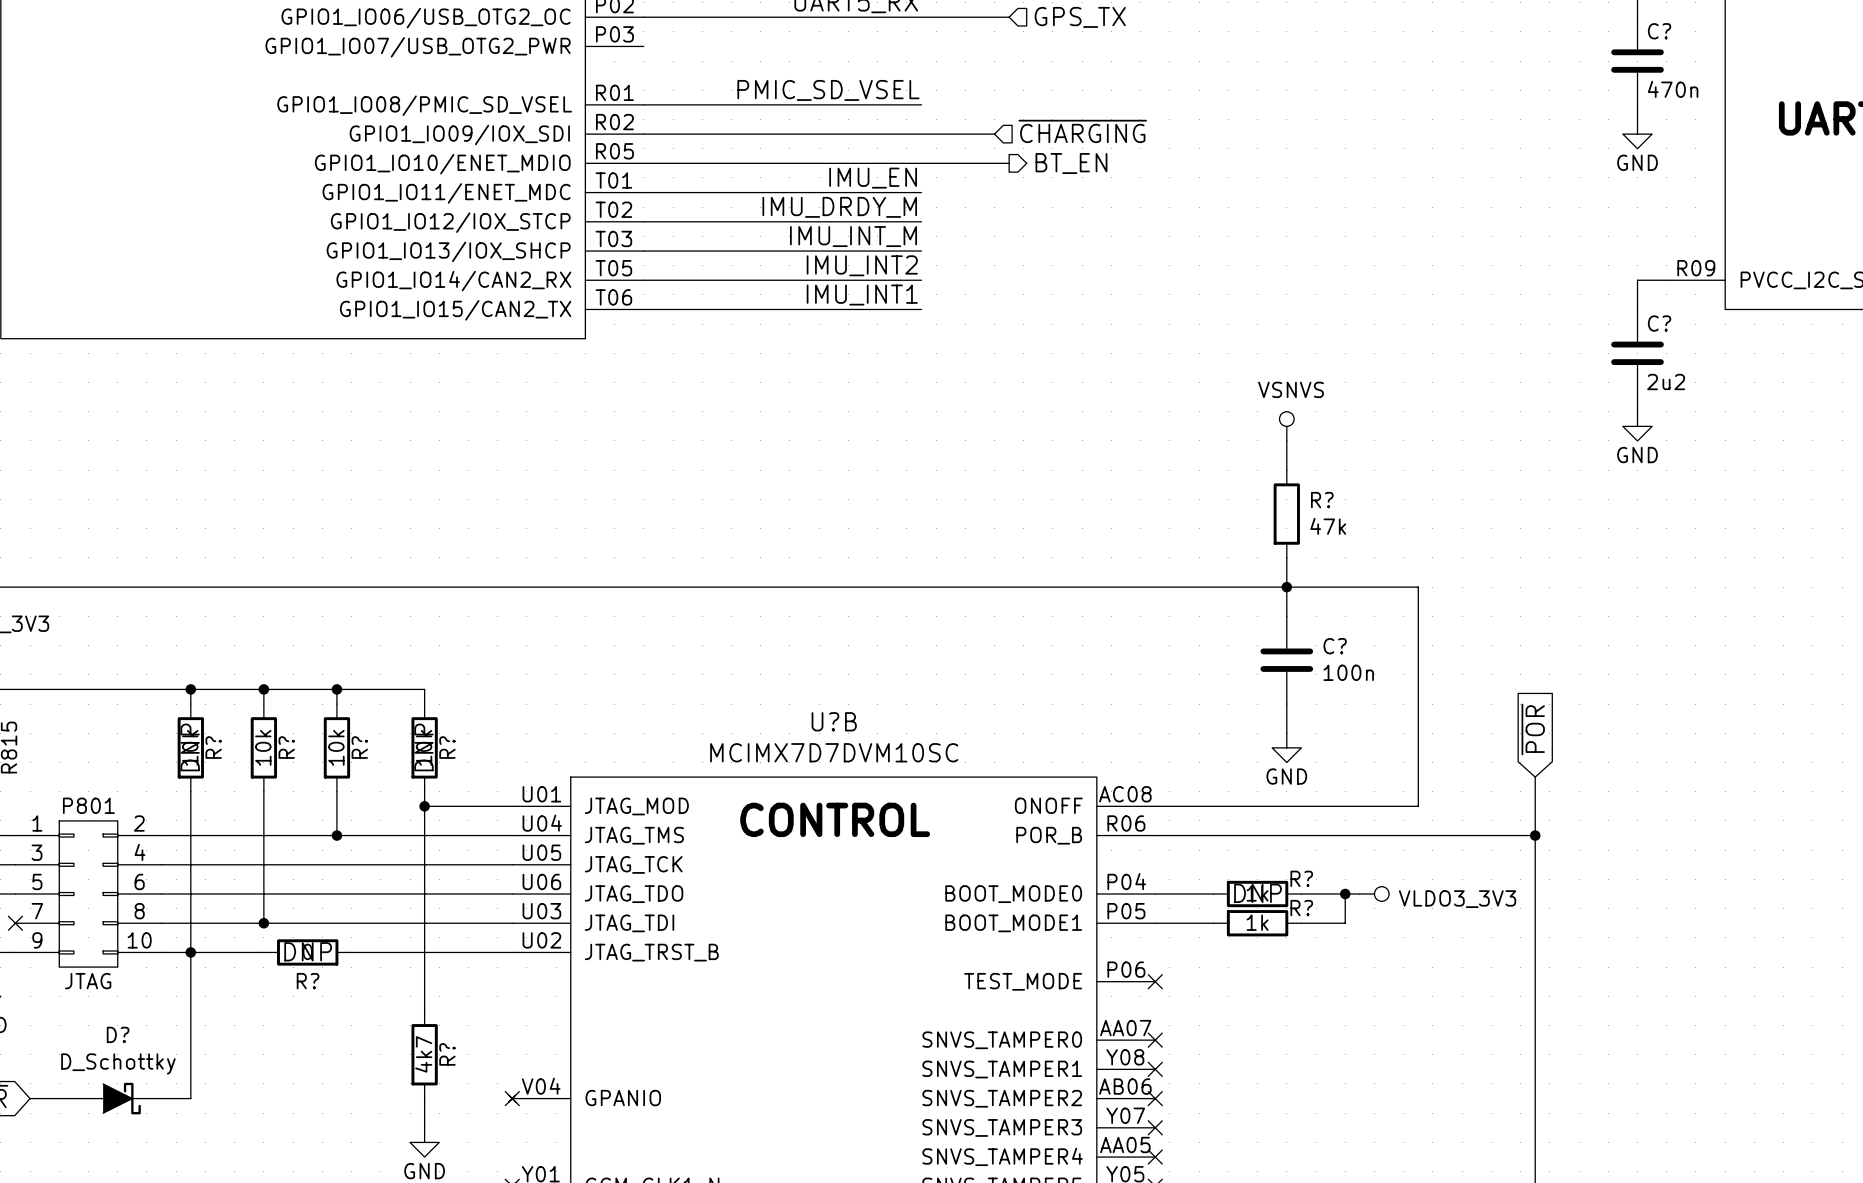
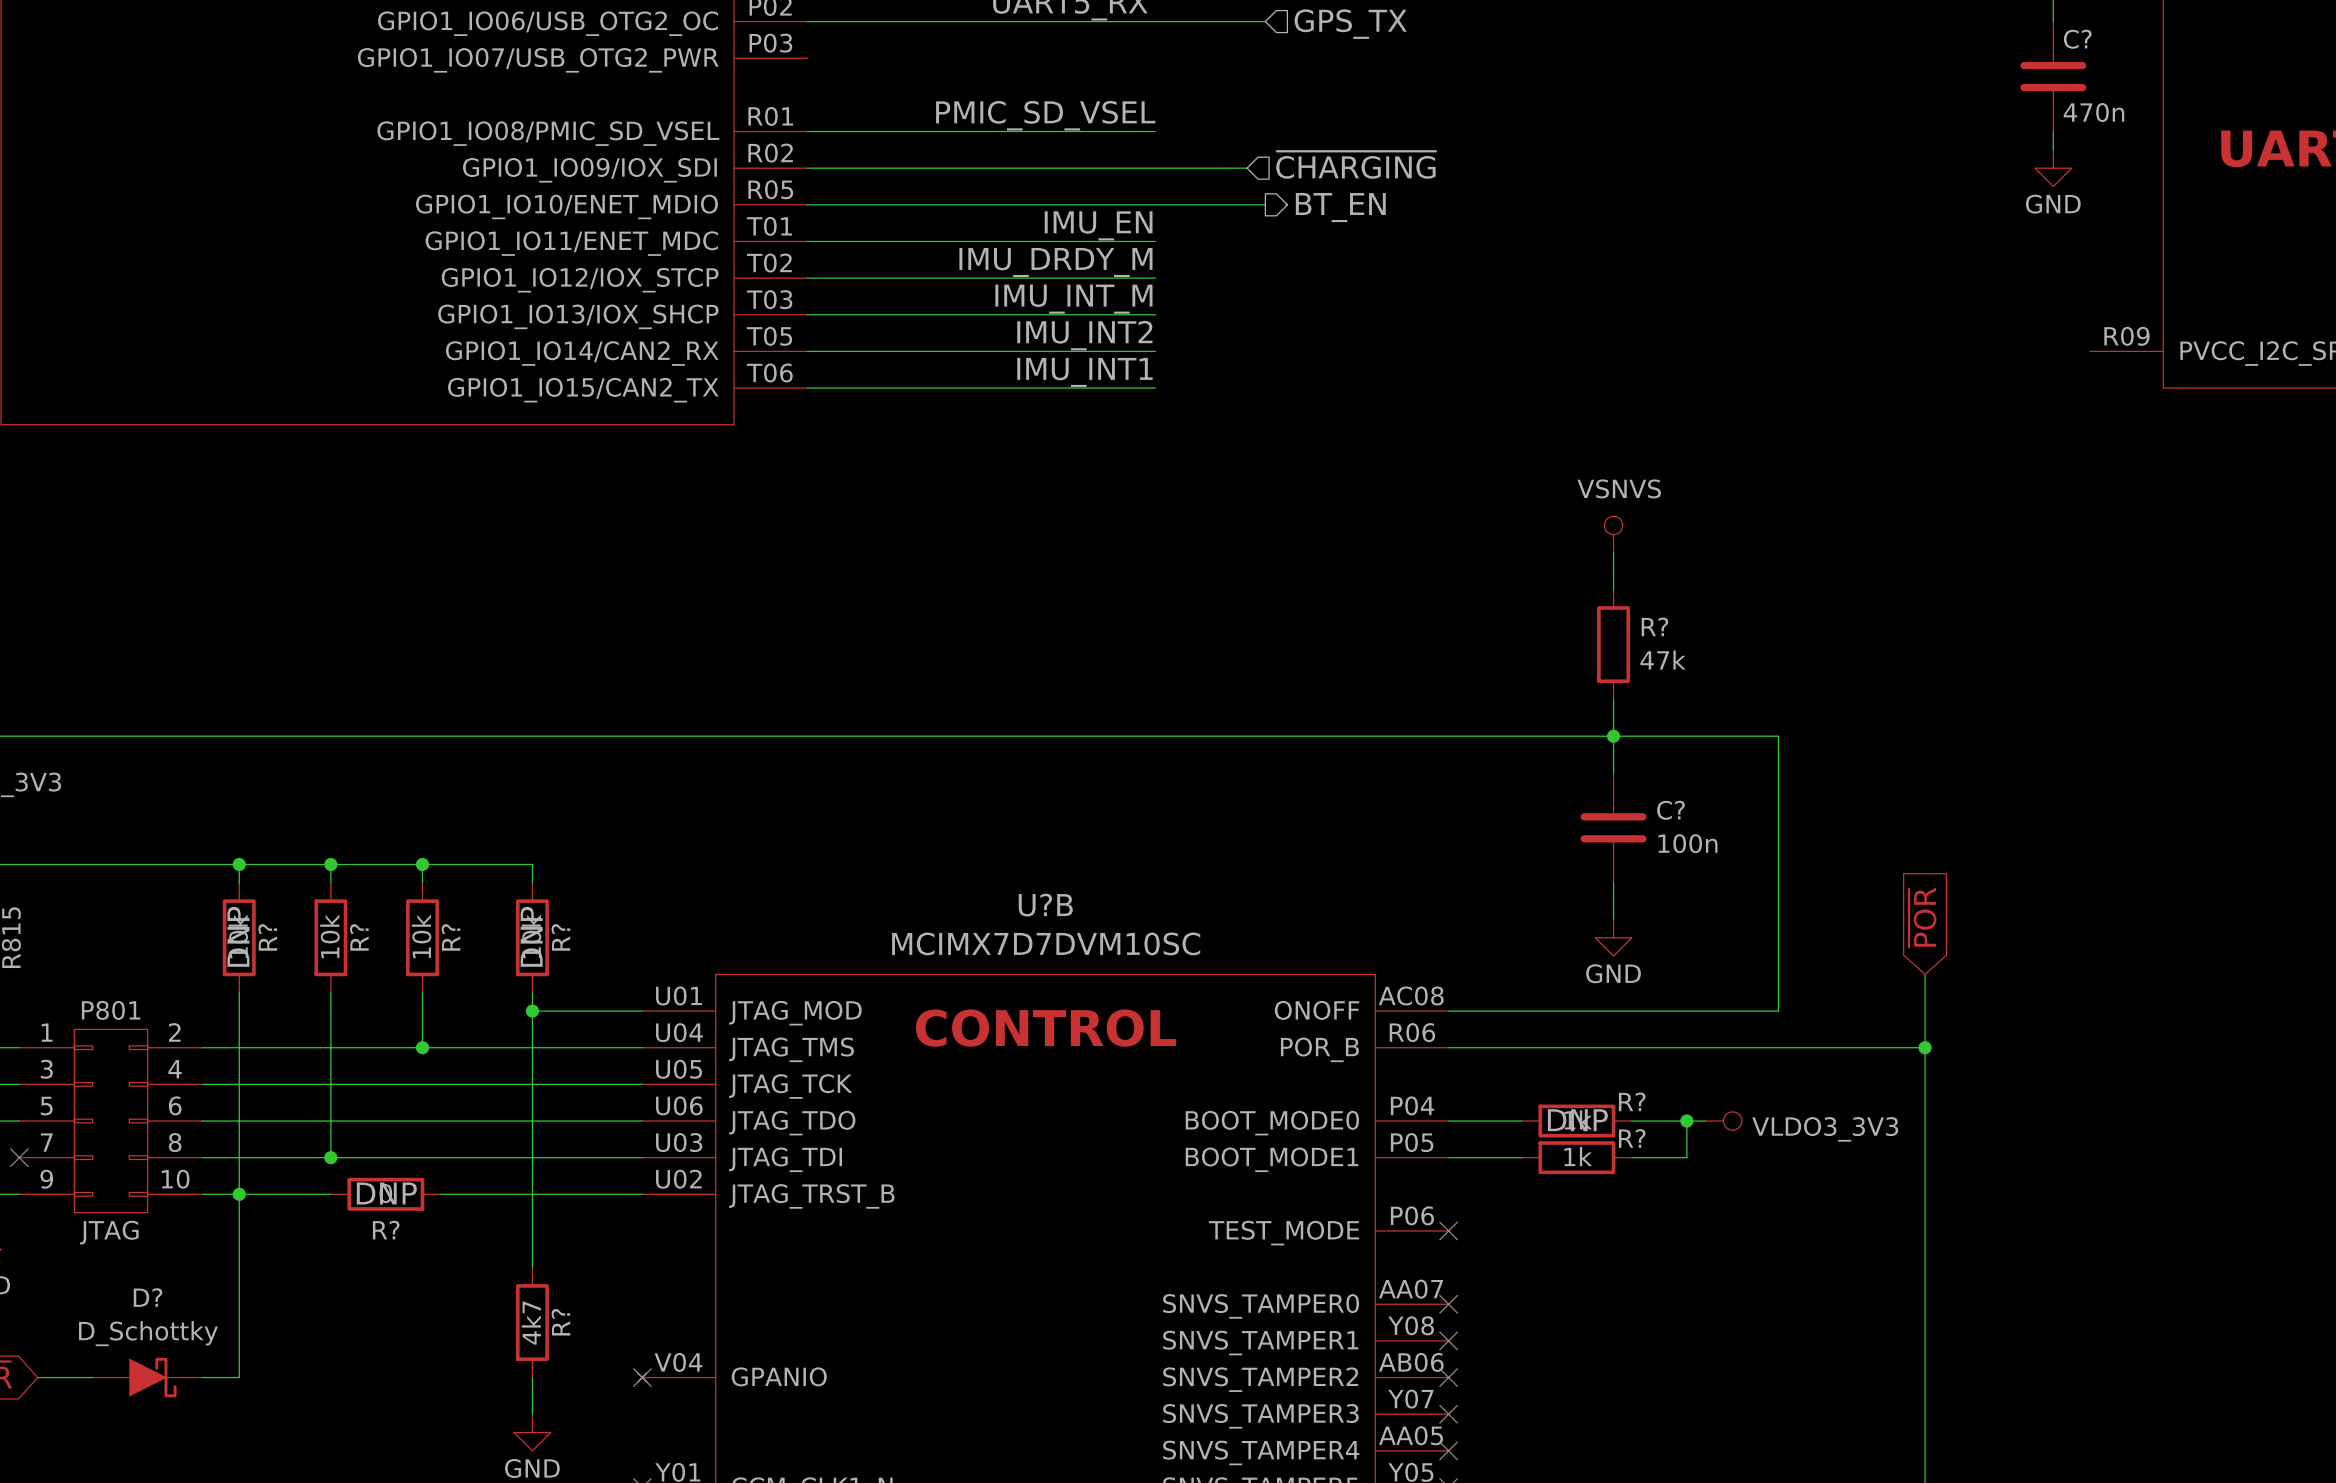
wire: (1666, 280) (1637, 280) (1637, 309) -> none
C?: 2u2 (1637, 353) -> none
wire: (1637, 397) (1637, 411) -> none
power symbol: GND (1637, 426) -> none

